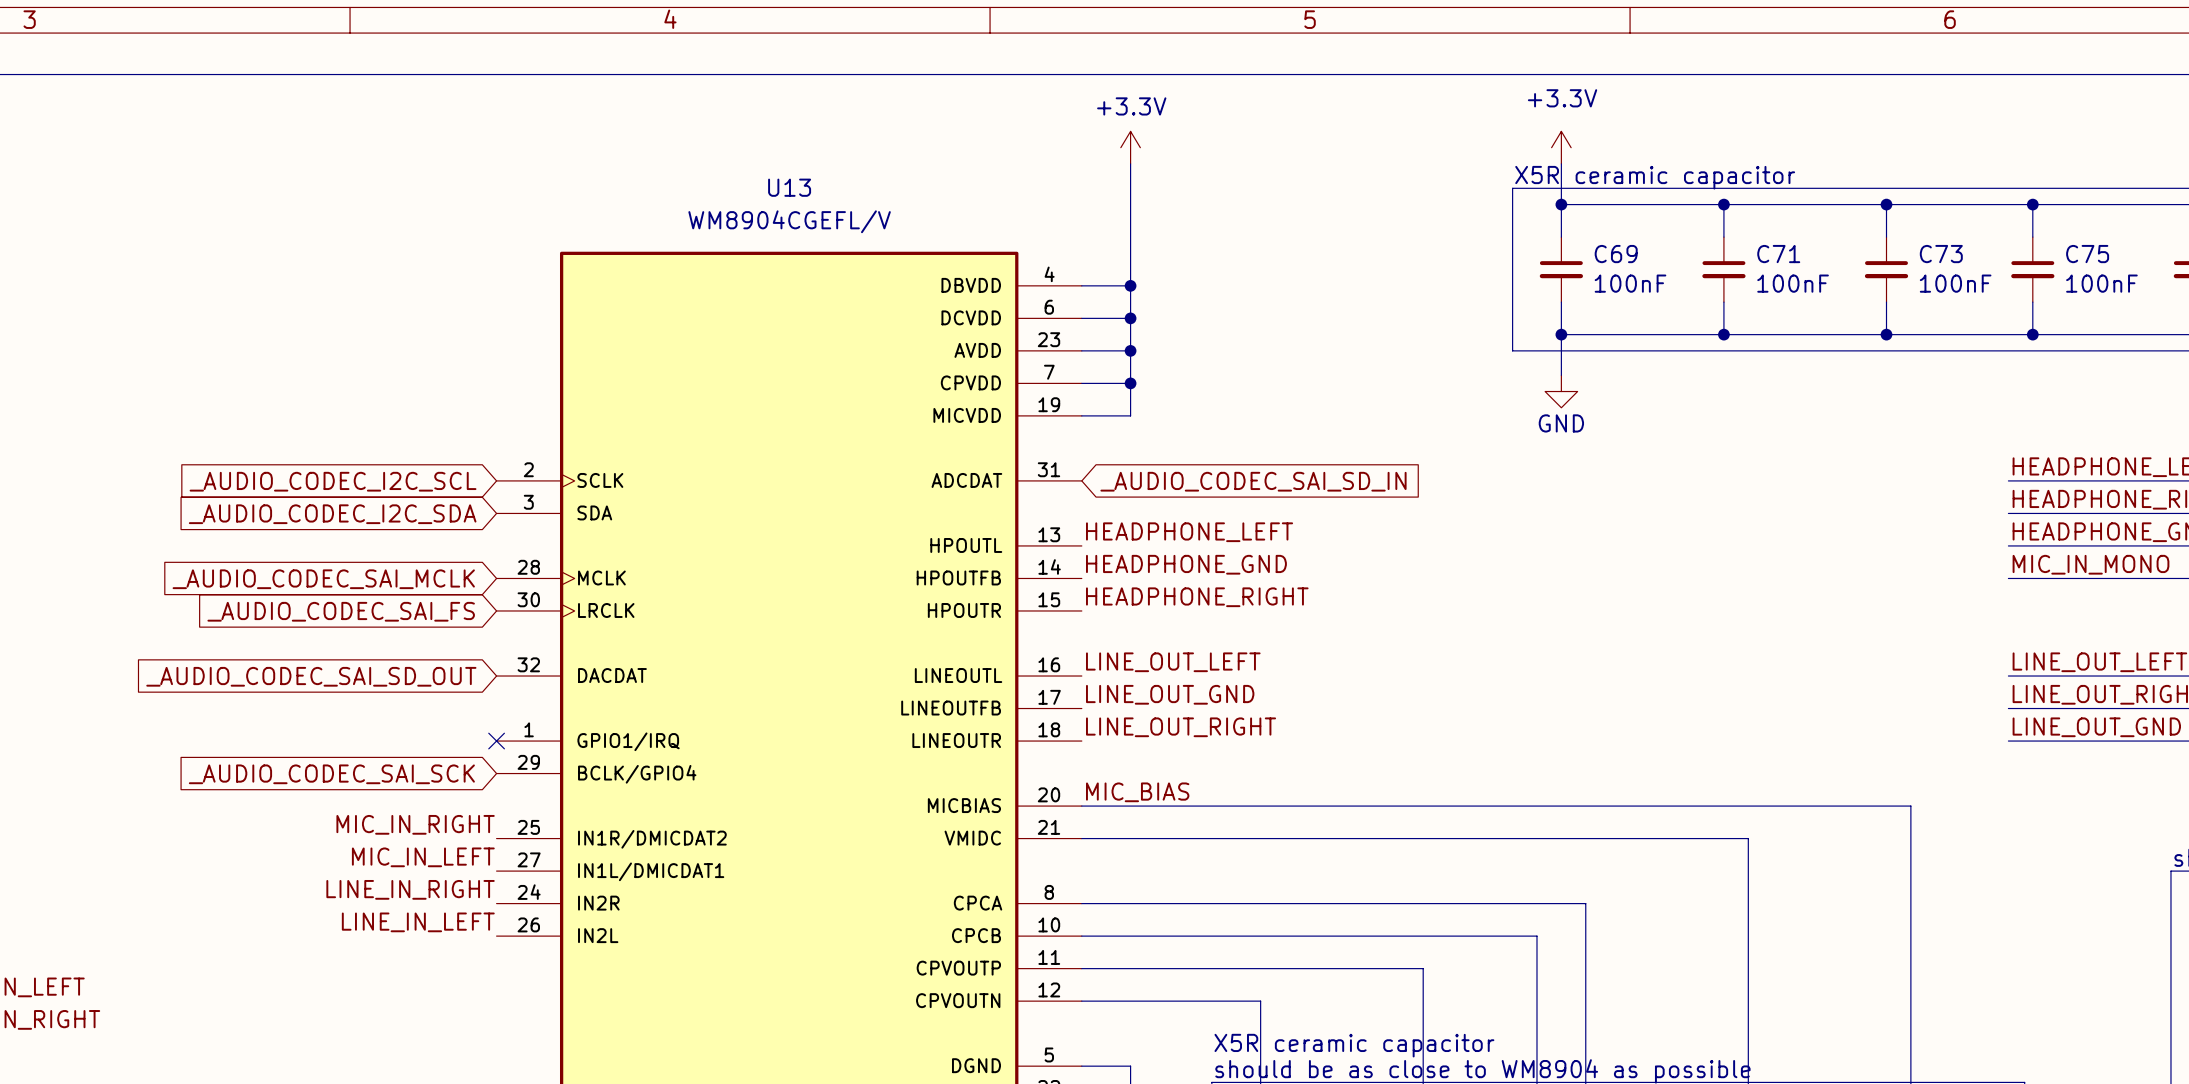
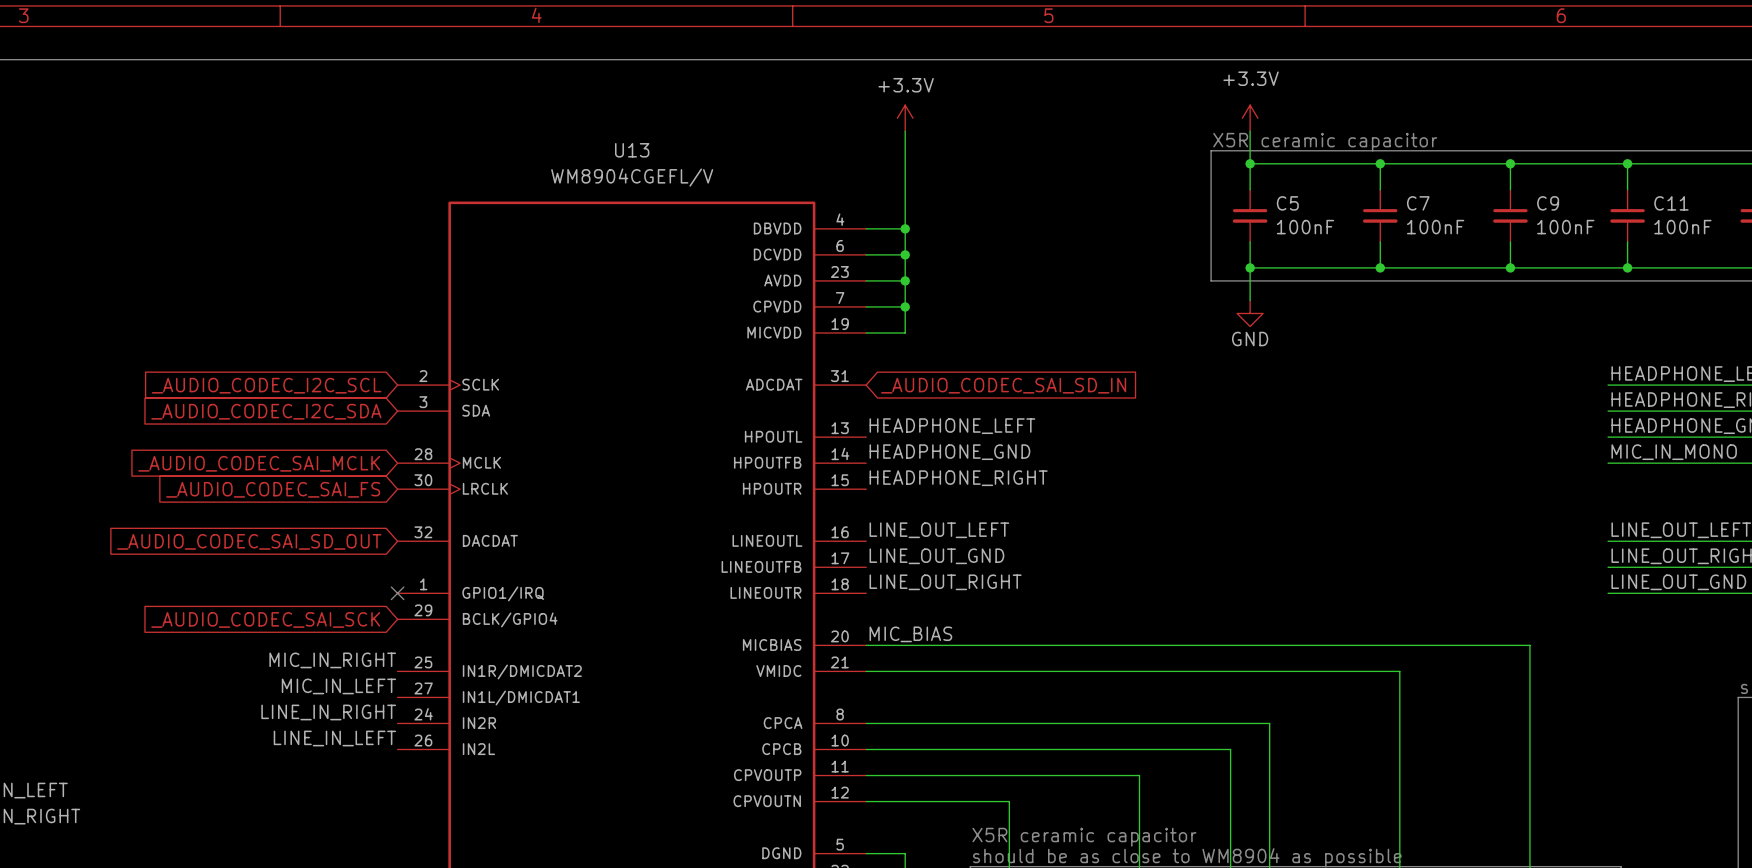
C69 name: C69 (1616, 254) -> C5 (1287, 203)
C71 name: C71 (1778, 254) -> C7 (1418, 203)
C73 name: C73 (1941, 254) -> C9 (1548, 203)
C75 name: C75 (2087, 254) -> C11 (1671, 203)

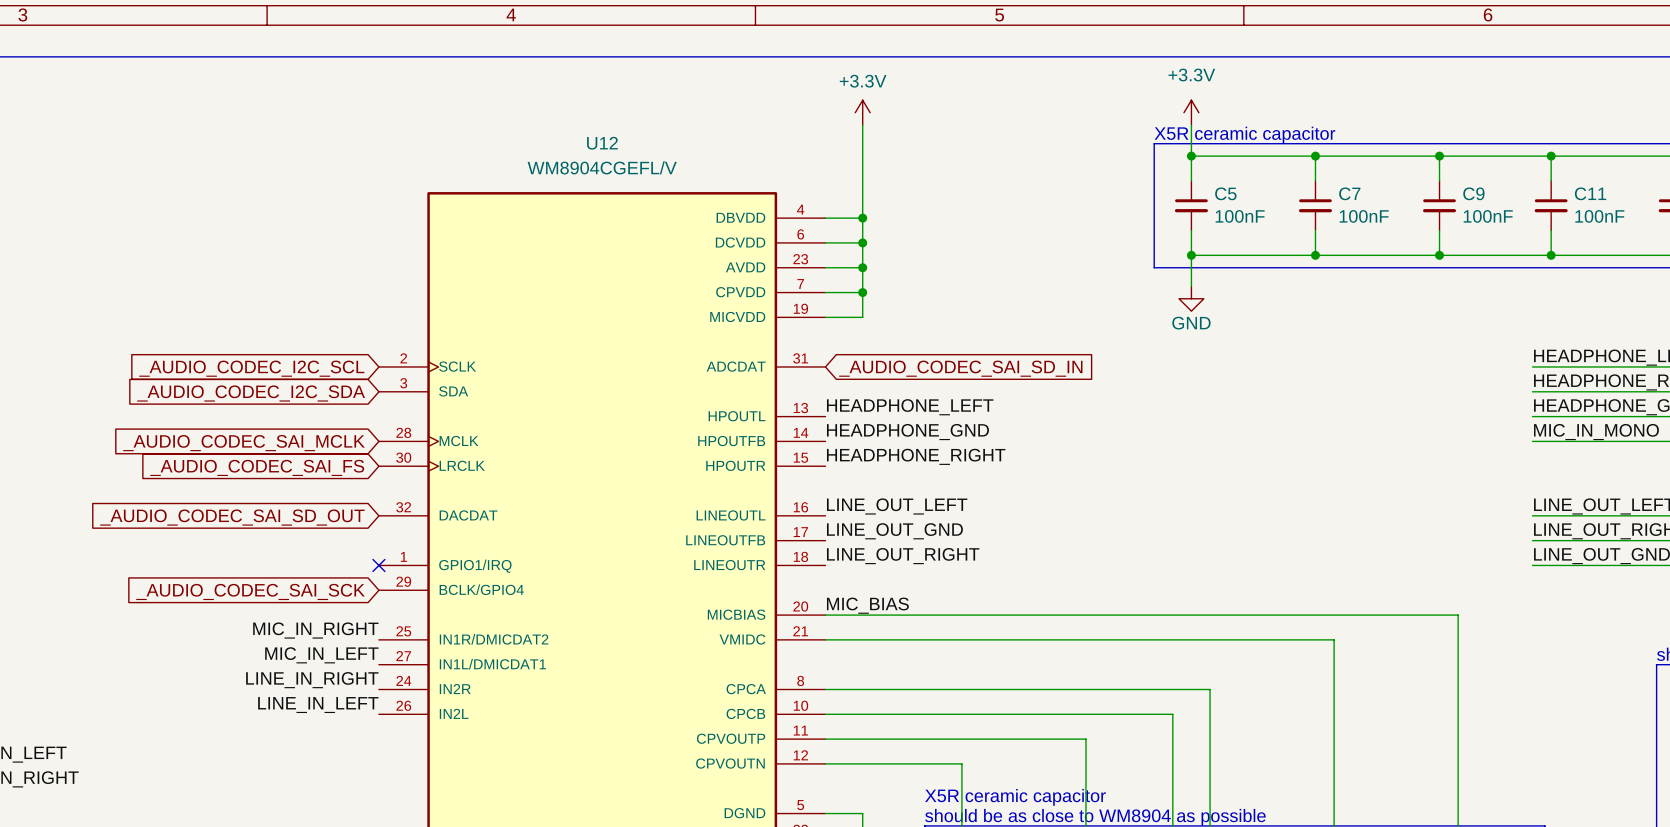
U13 name: U13 (632, 150) -> U12 (602, 143)

